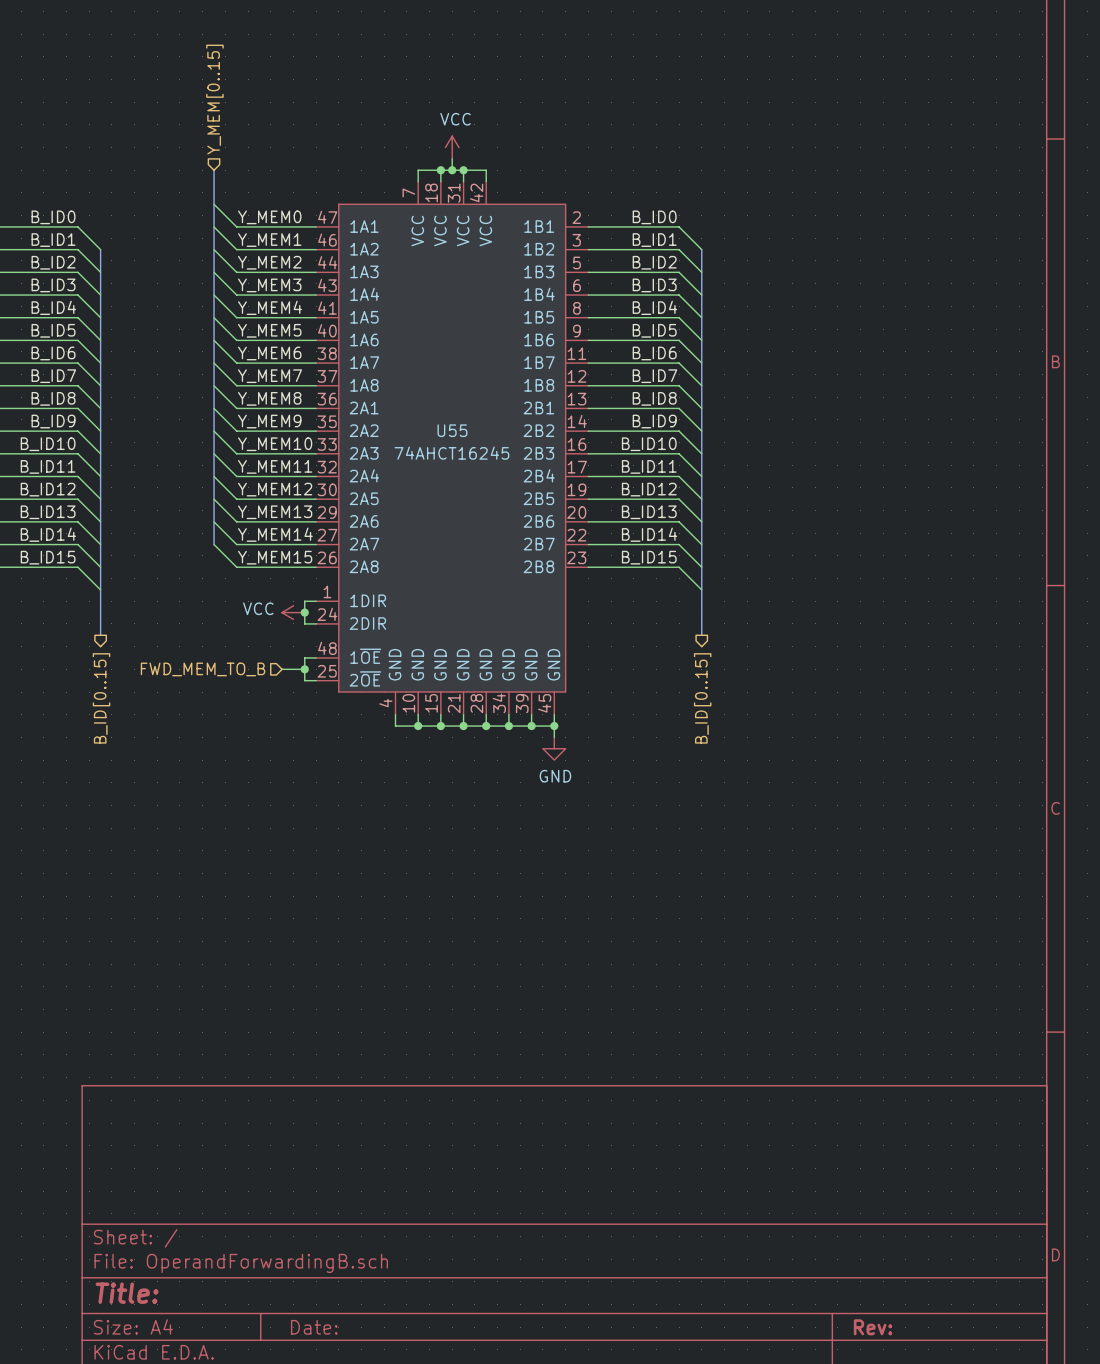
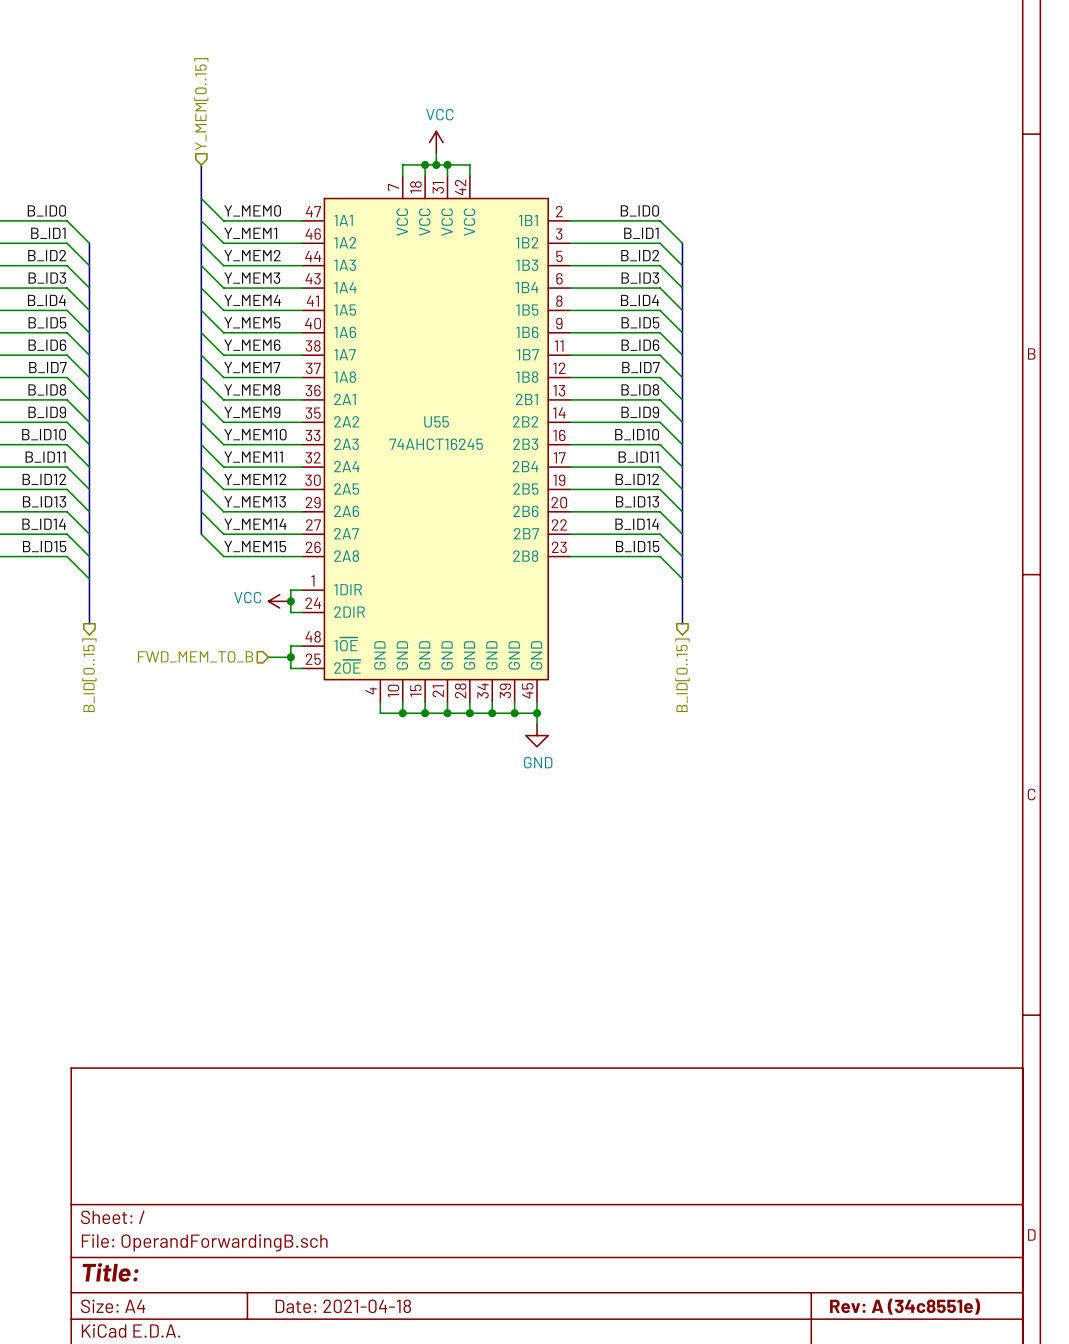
title block: Date: (314, 1327) -> Date: 2021-04-18 (343, 1306)
title block: Rev: (873, 1327) -> Rev: A (34c8551e) (905, 1306)

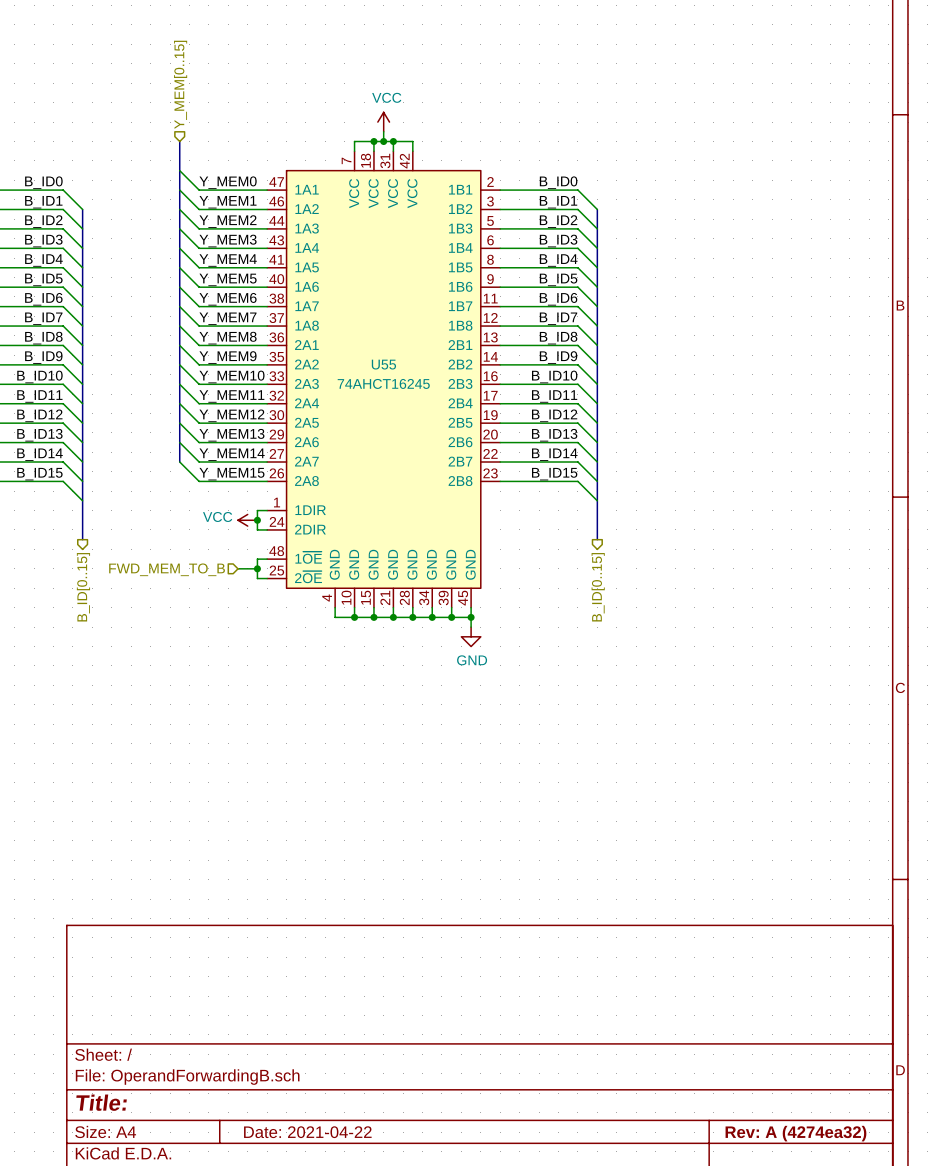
title block: Date: 2021-04-18 (343, 1306) -> Date: 2021-04-22 (307, 1132)
title block: Rev: A (34c8551e) (905, 1306) -> Rev: A (4274ea32) (795, 1133)

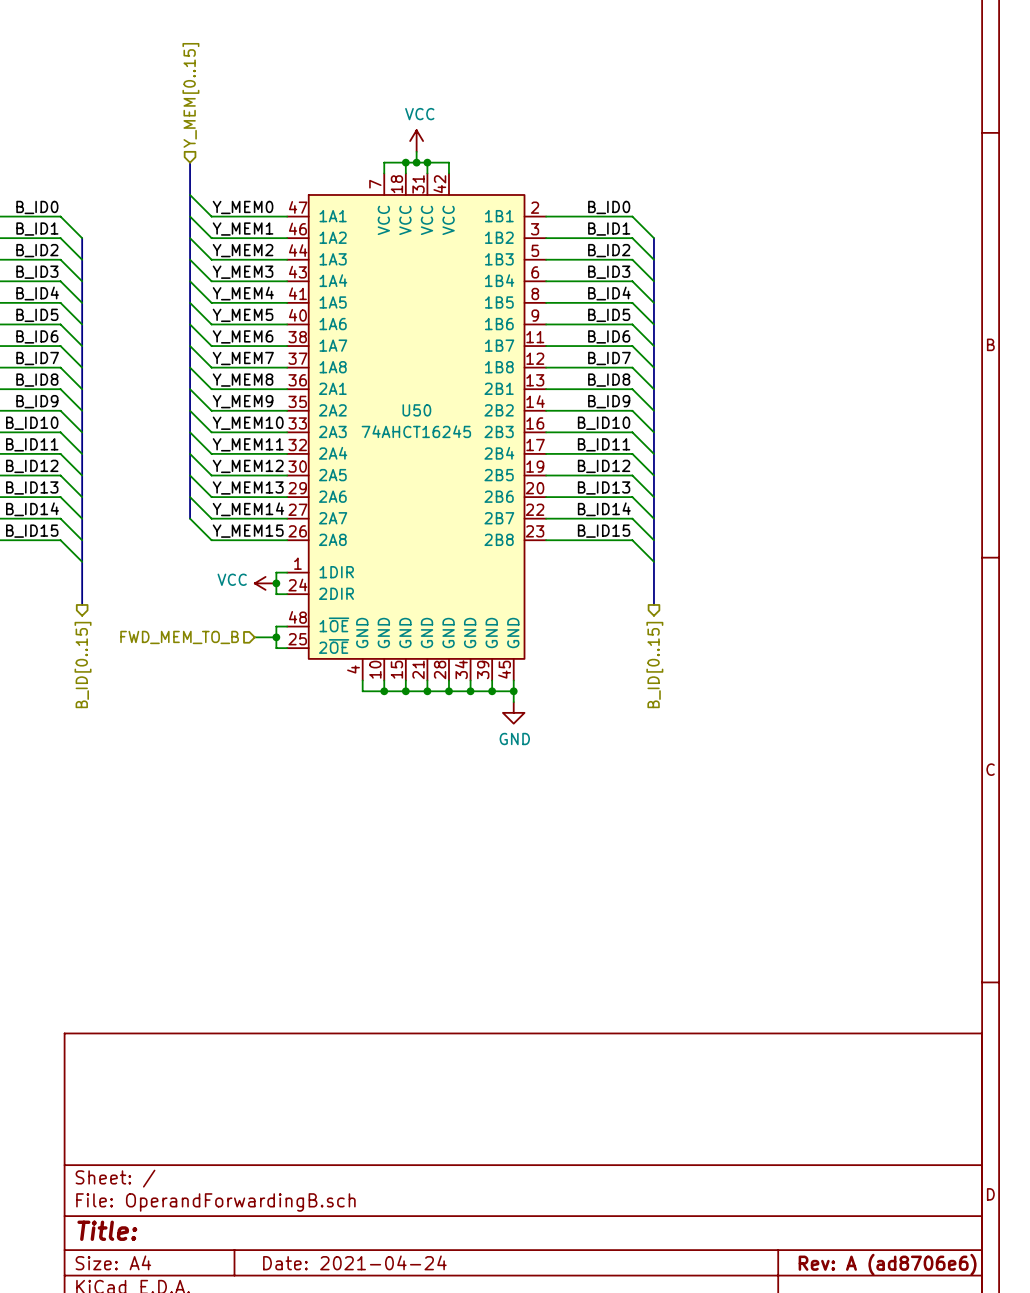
U55 name: U55 (383, 364) -> U50 (416, 410)
title block: Date: 2021-04-22 (307, 1132) -> Date: 2021-04-24 (354, 1262)
title block: Rev: A (4274ea32) (795, 1133) -> Rev: A (ad8706e6) (887, 1264)

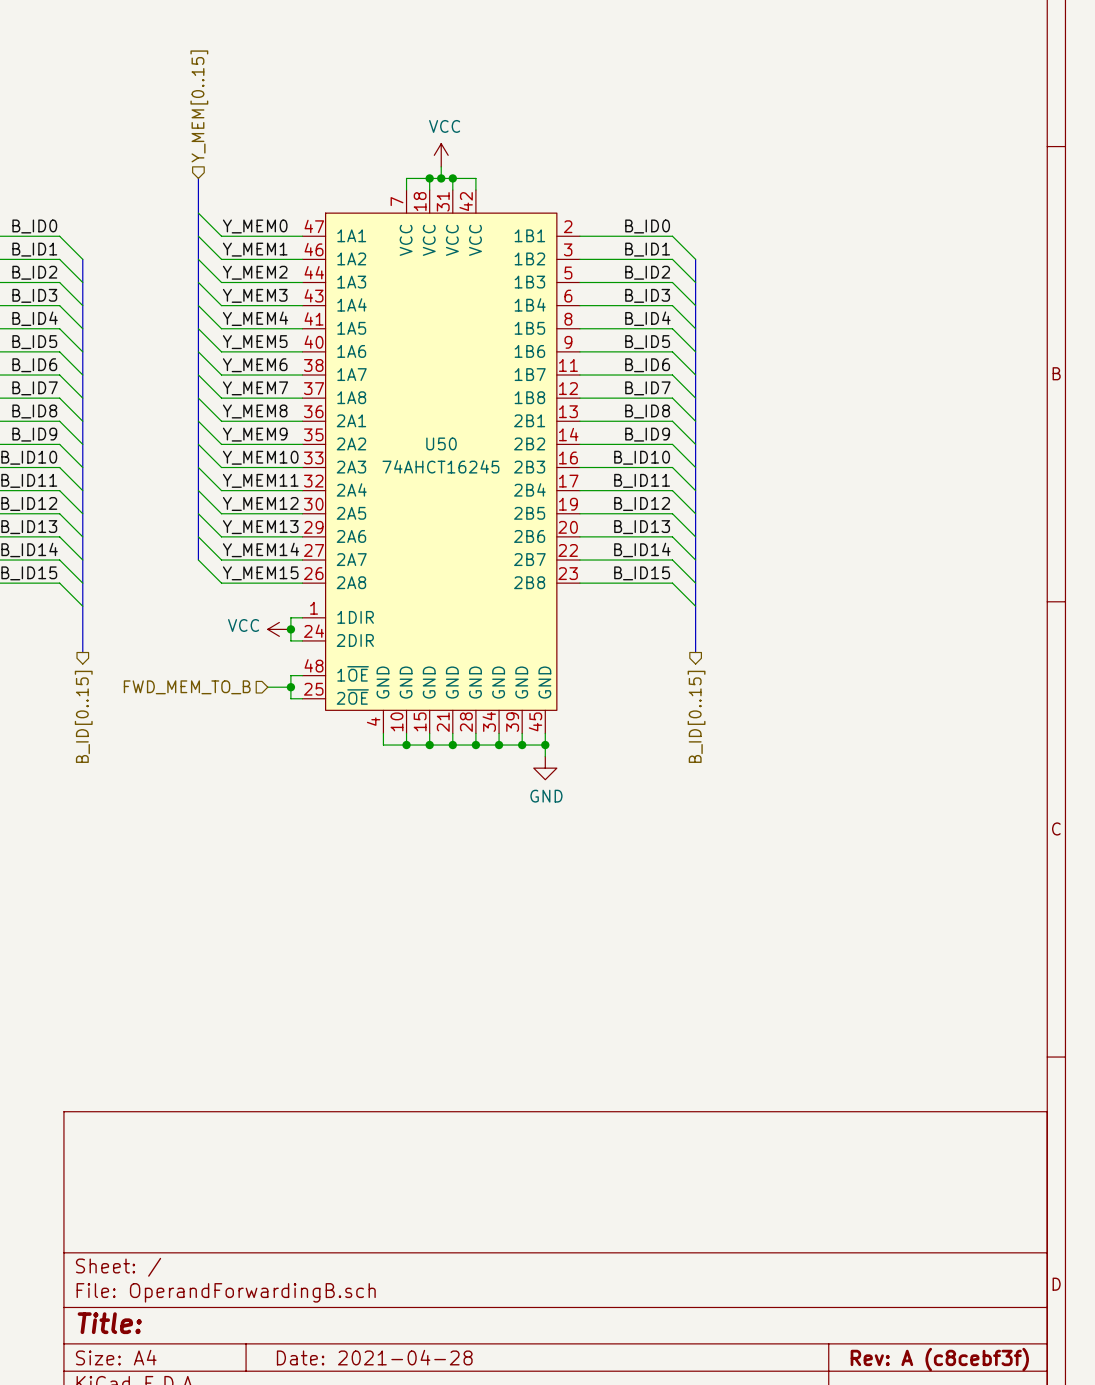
title block: Date: 2021-04-24 (354, 1262) -> Date: 2021-04-28 (374, 1357)
title block: Rev: A (ad8706e6) (887, 1264) -> Rev: A (c8cebf3f) (939, 1359)

